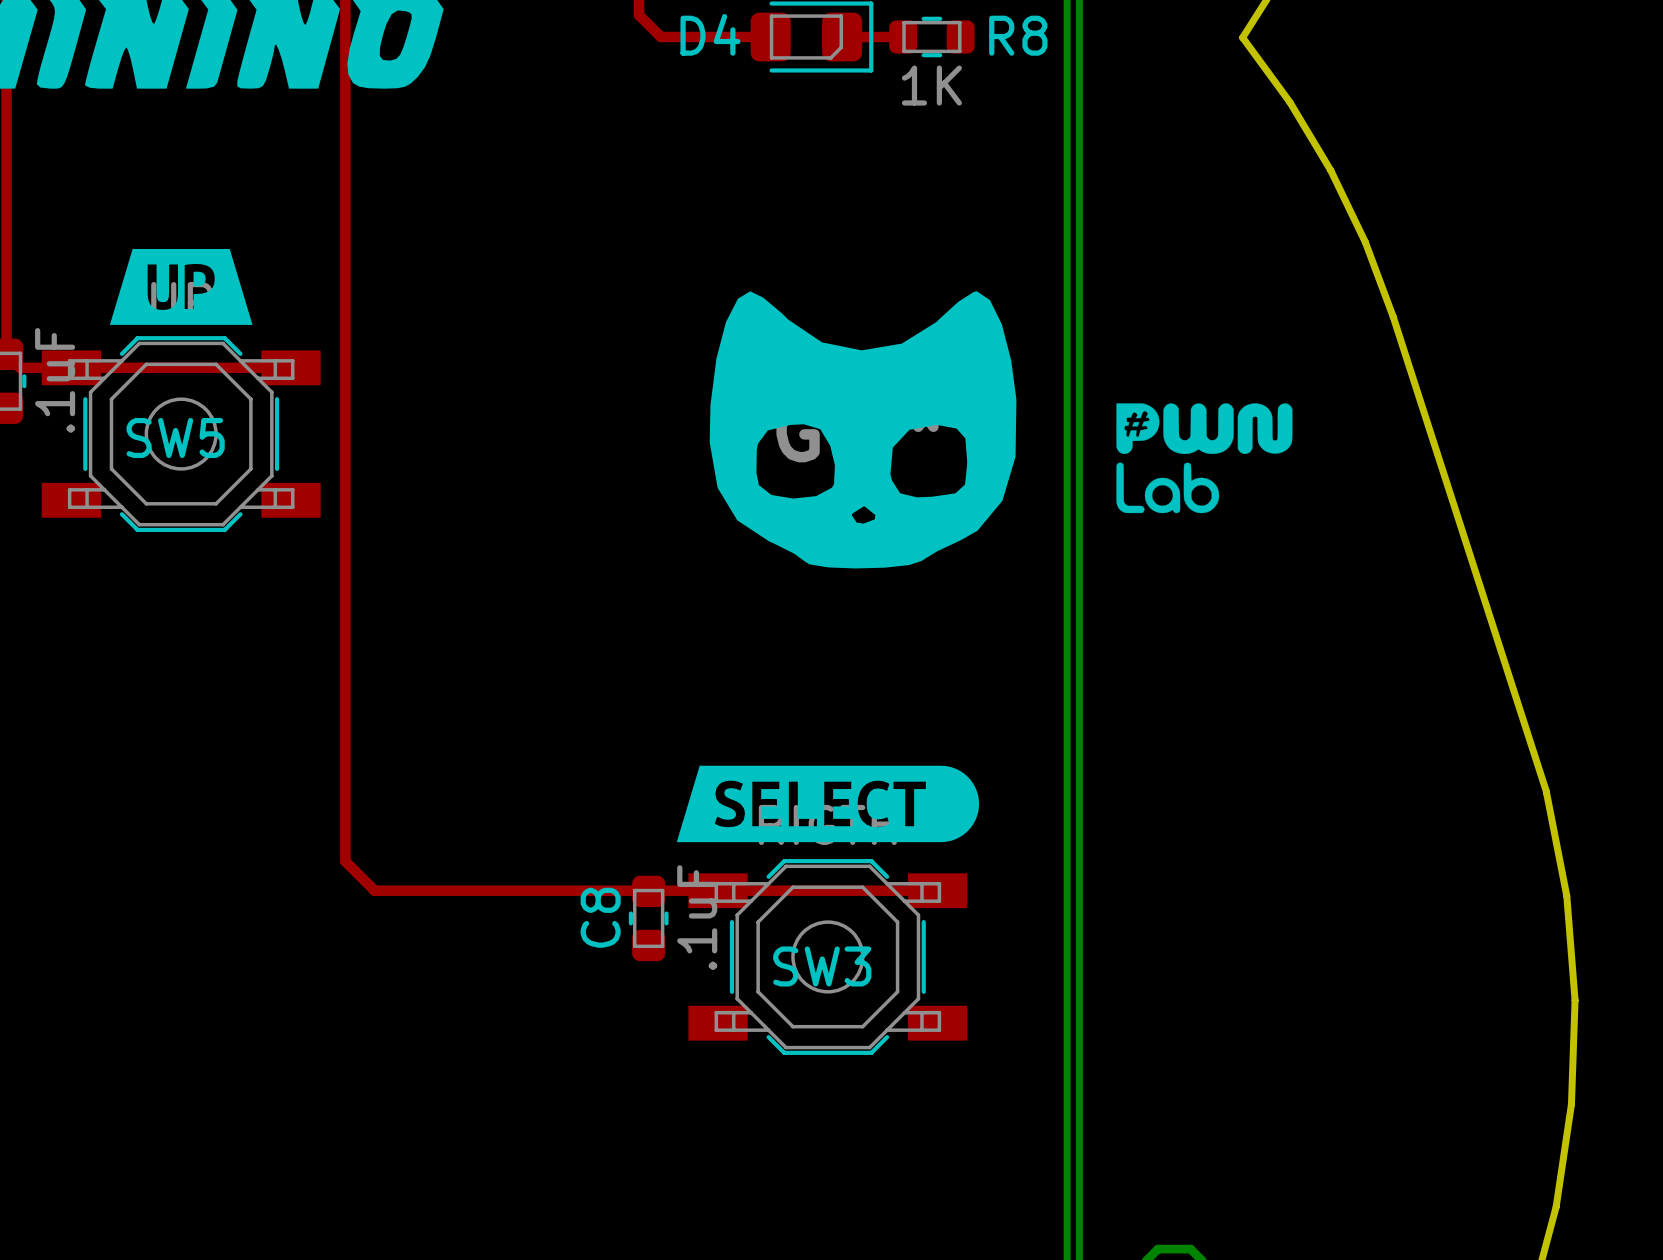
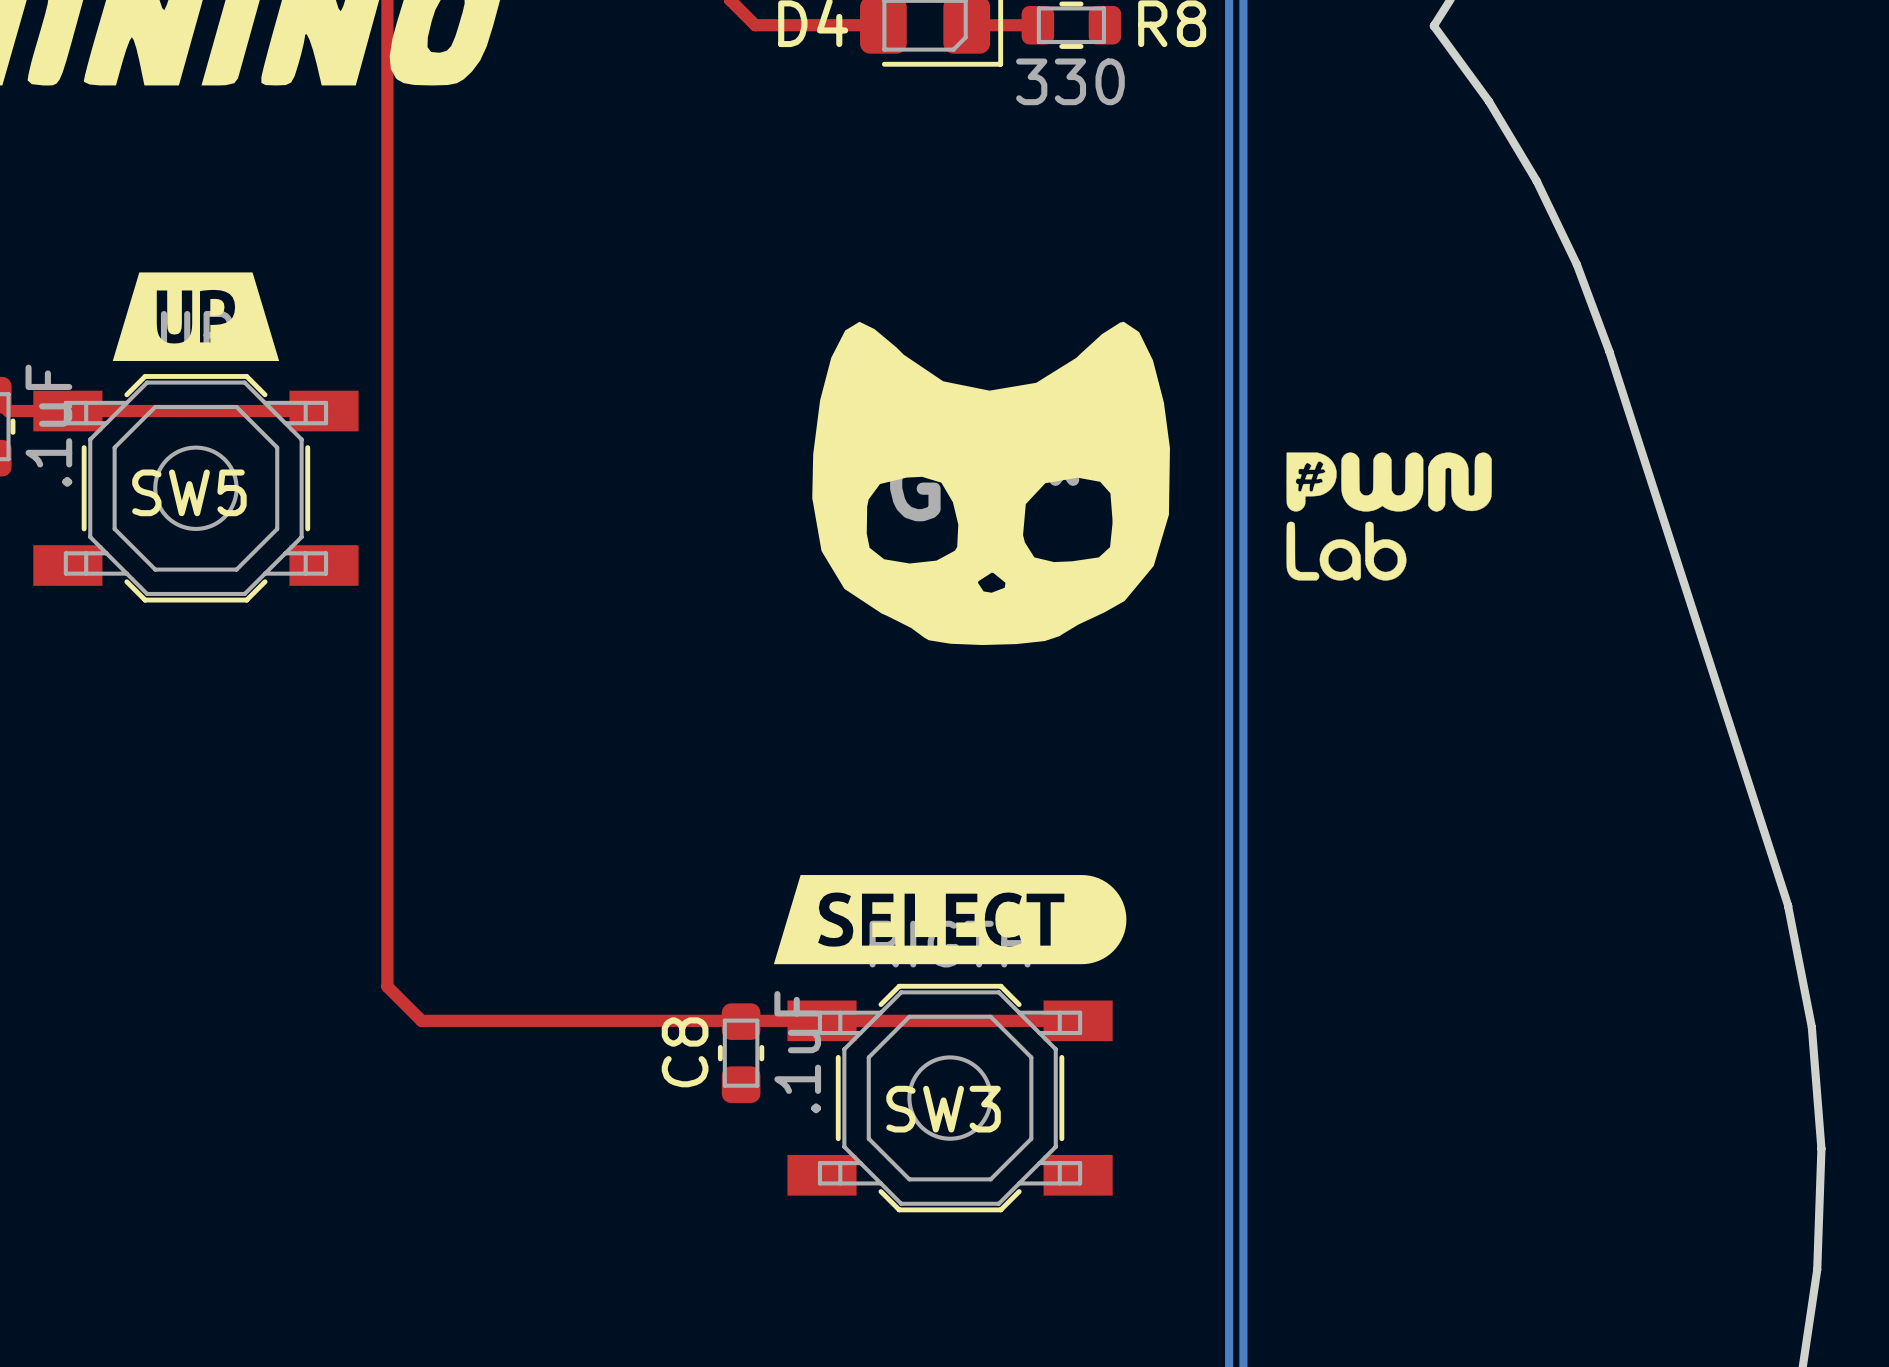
R8 value: 1K (931, 85) -> 330 (1070, 81)

